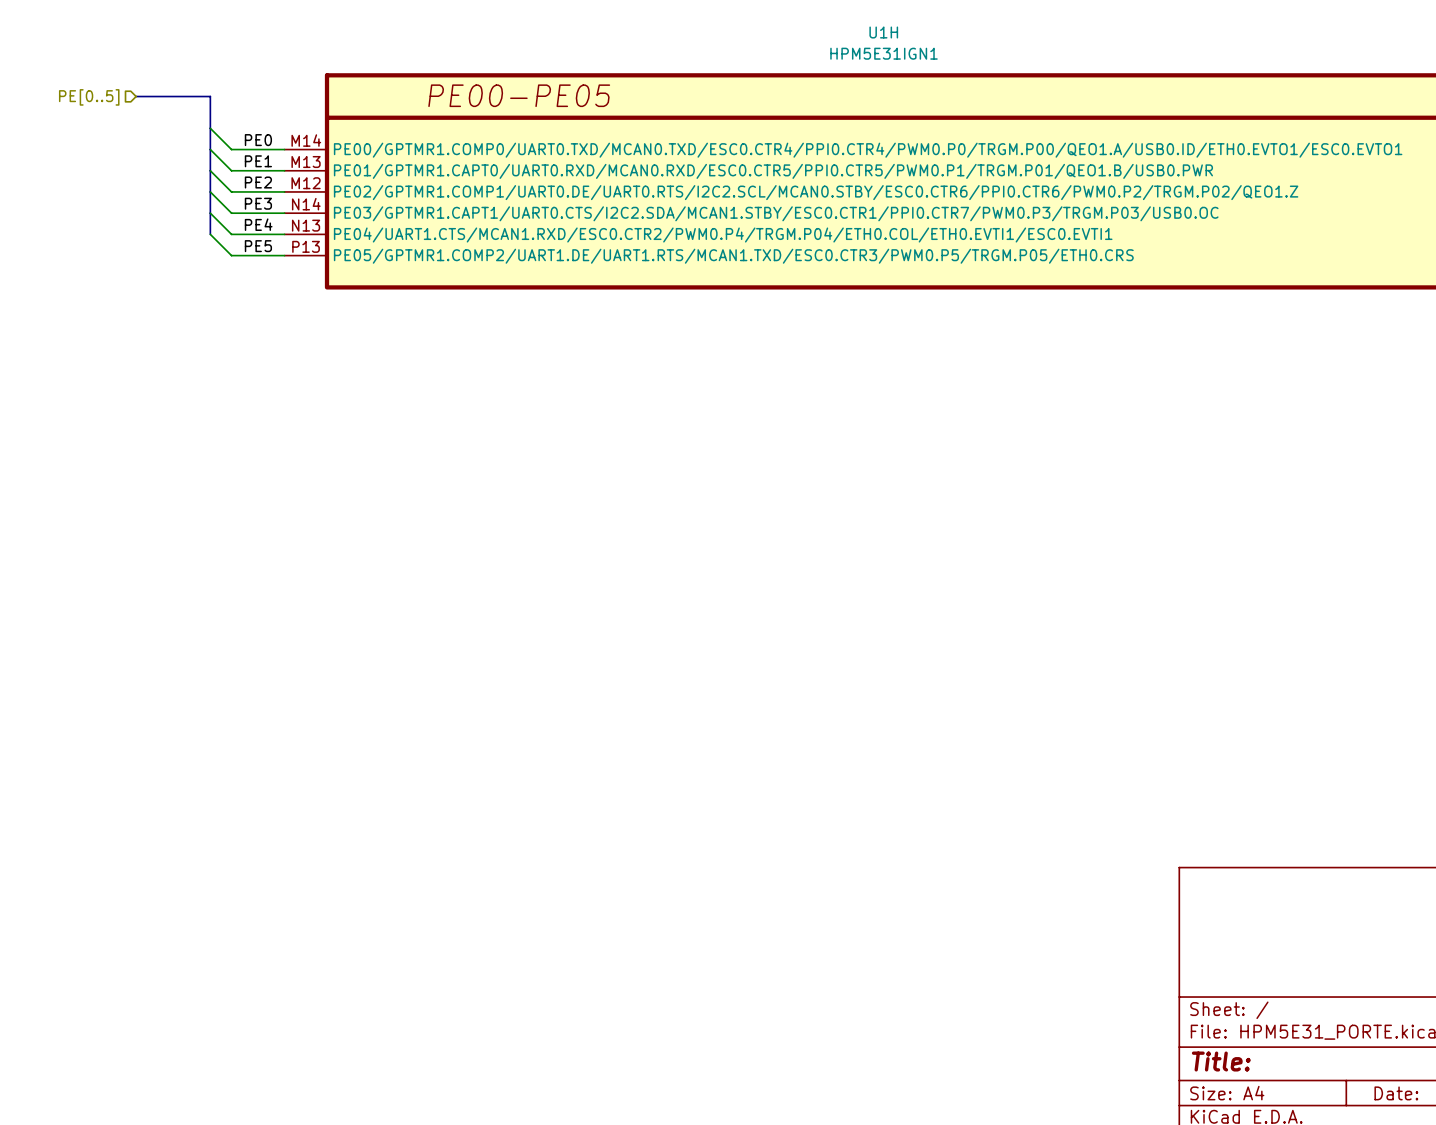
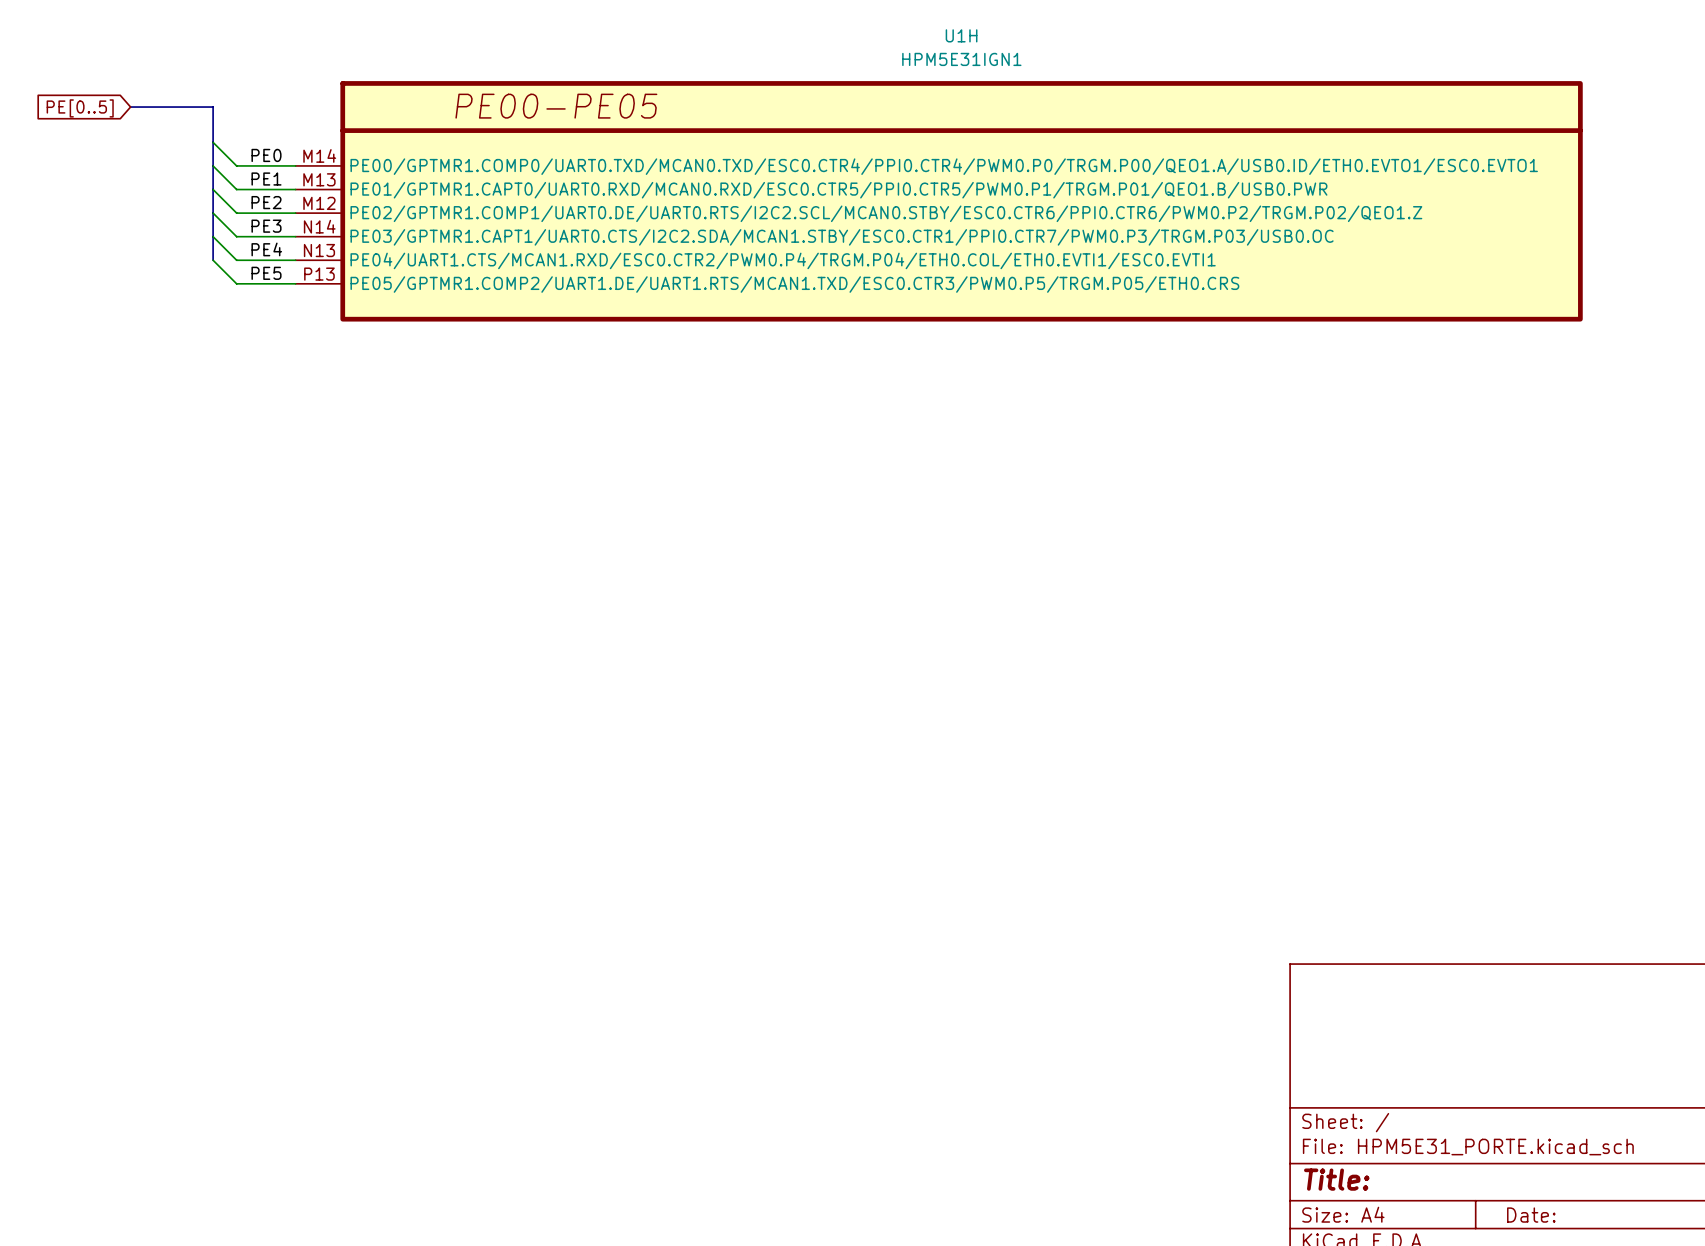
hierarchical label: PE[0..5] (89, 97) -> none
global label: none -> PE[0..5] (80, 108)

